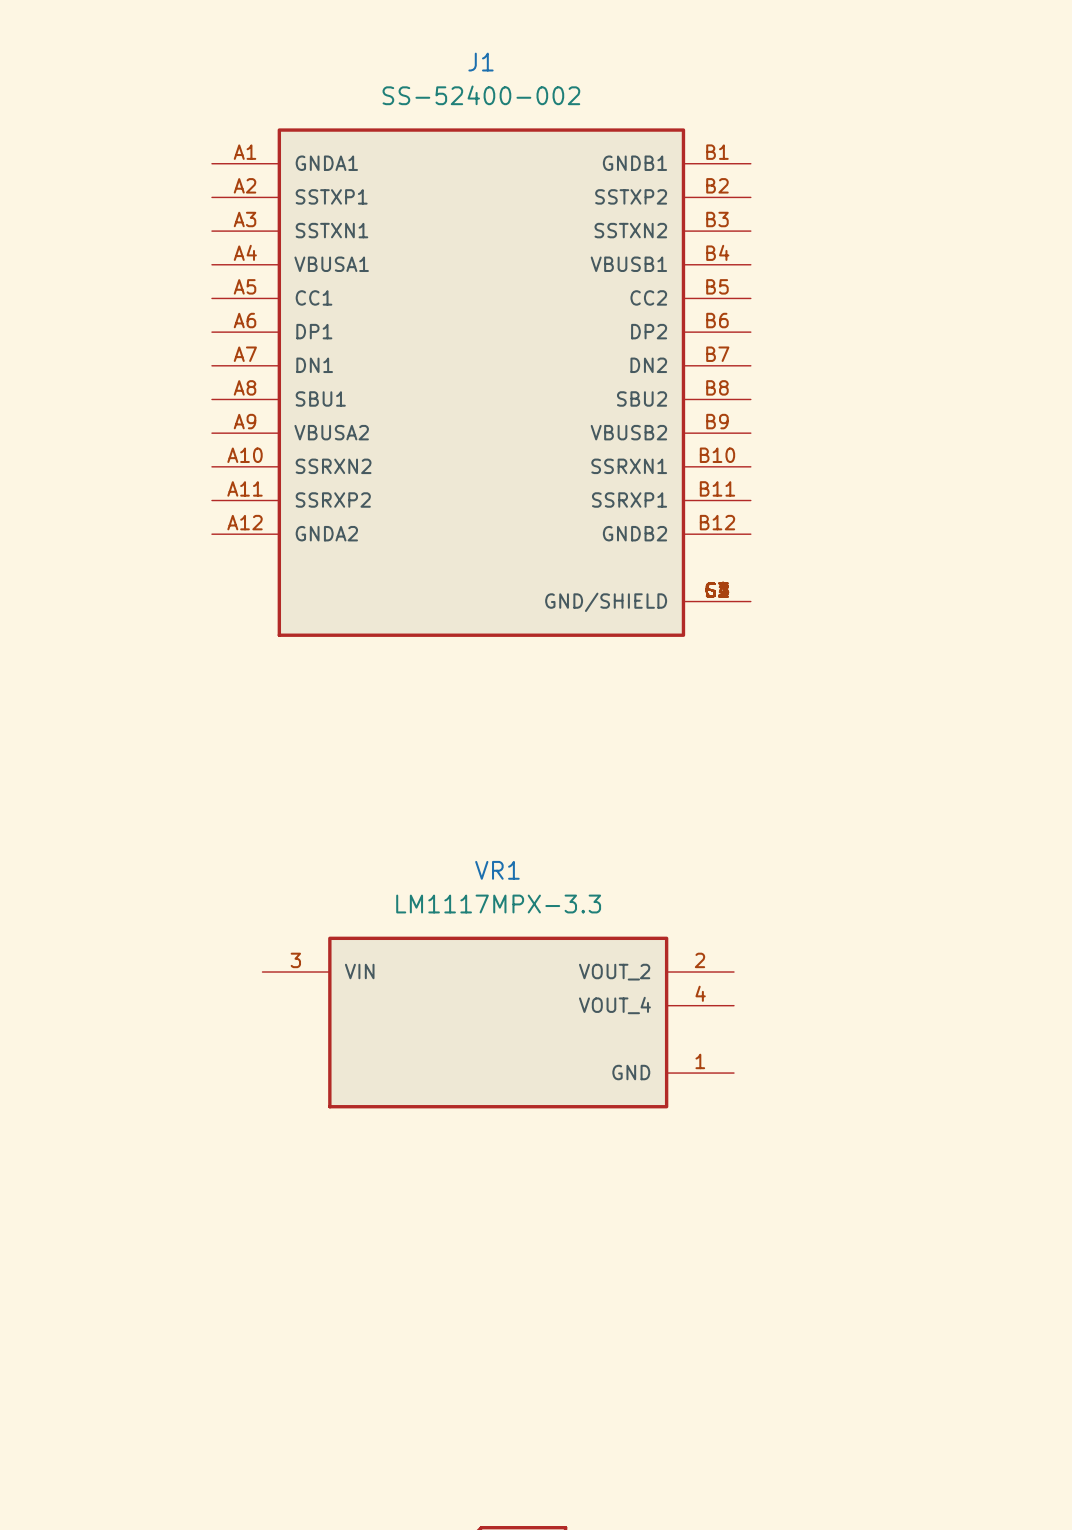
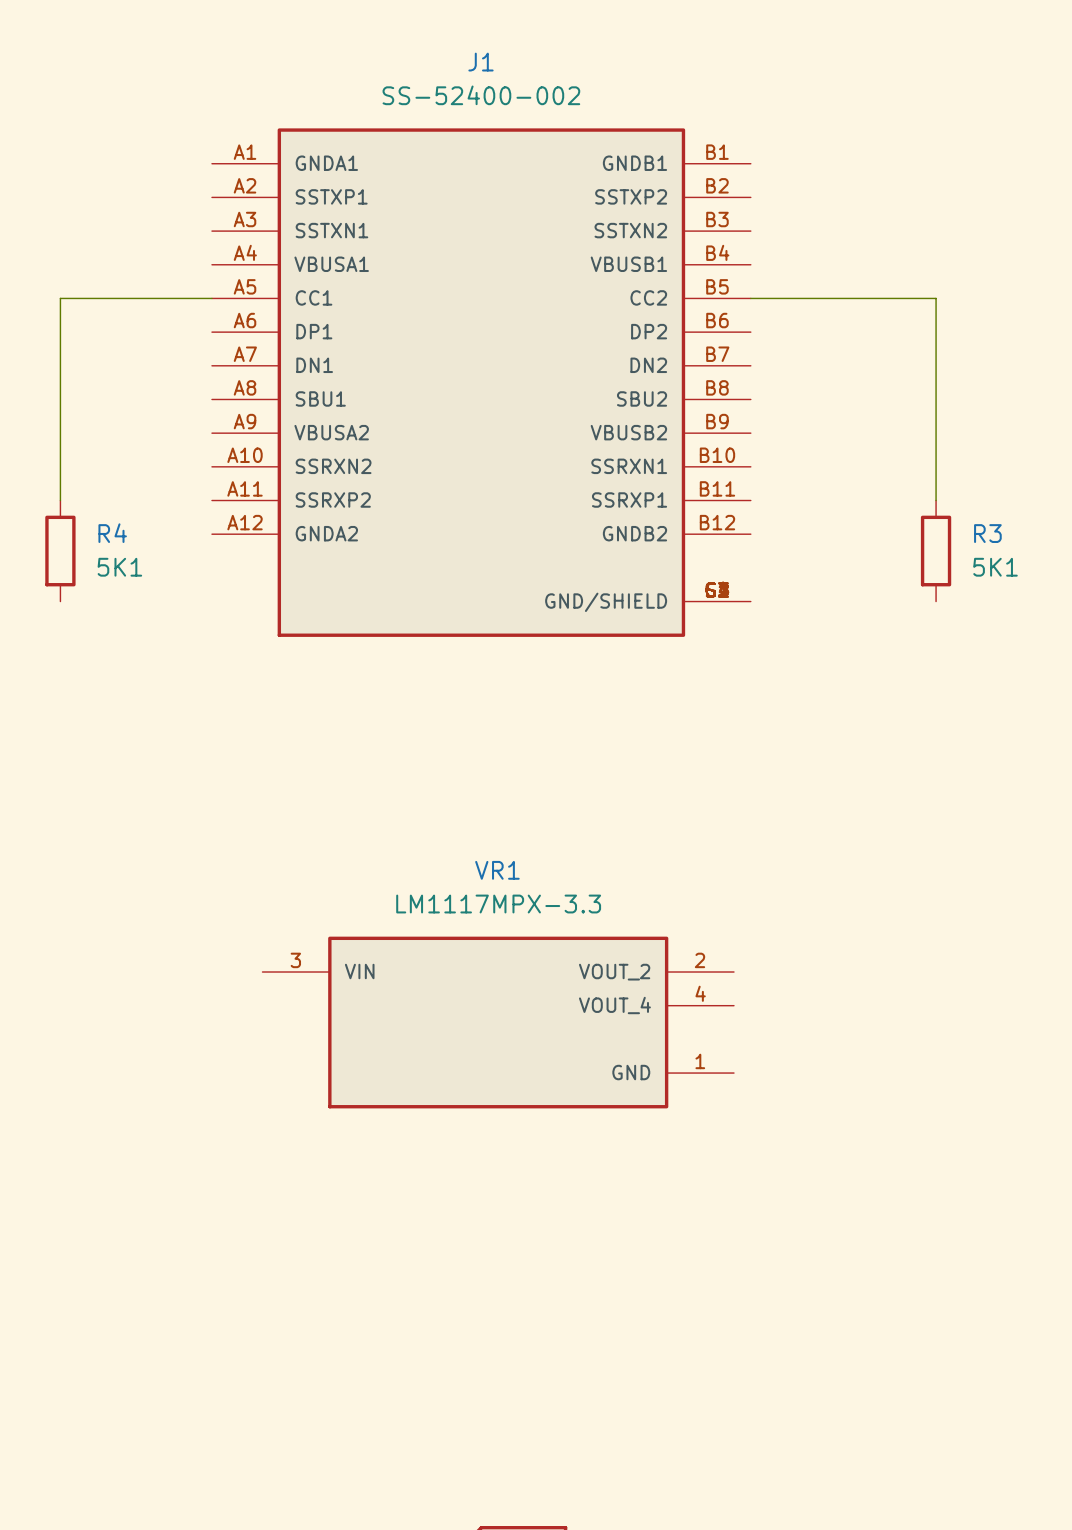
wire: none -> (211, 298) (60, 298) (60, 500)
wire: none -> (750, 298) (936, 298) (936, 500)
R4: none -> 5K1 (60, 551)
R3: none -> 5K1 (936, 551)

